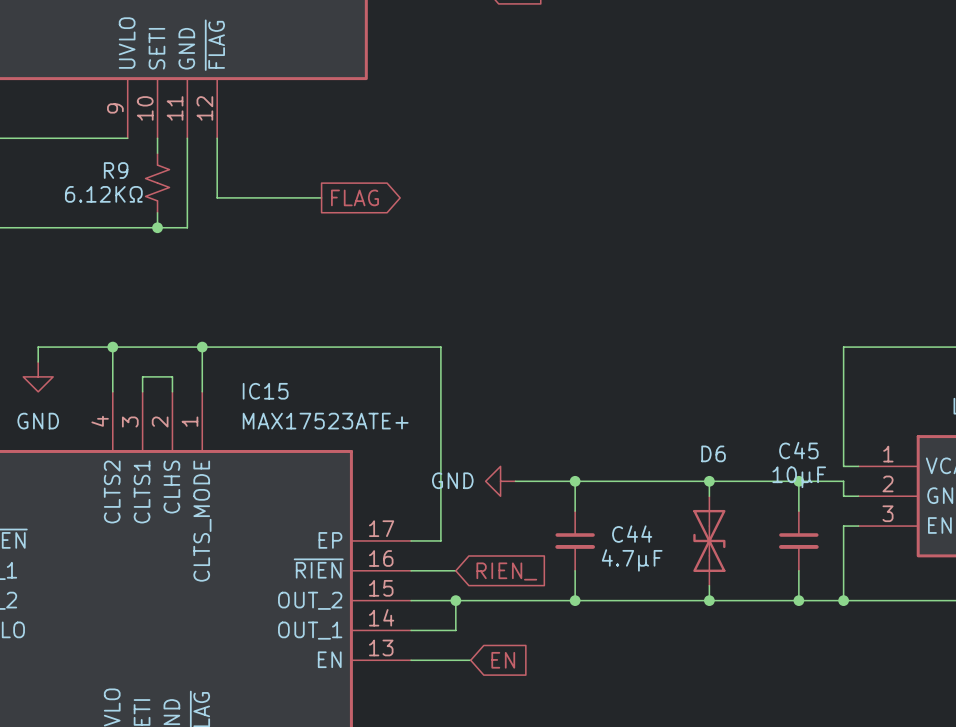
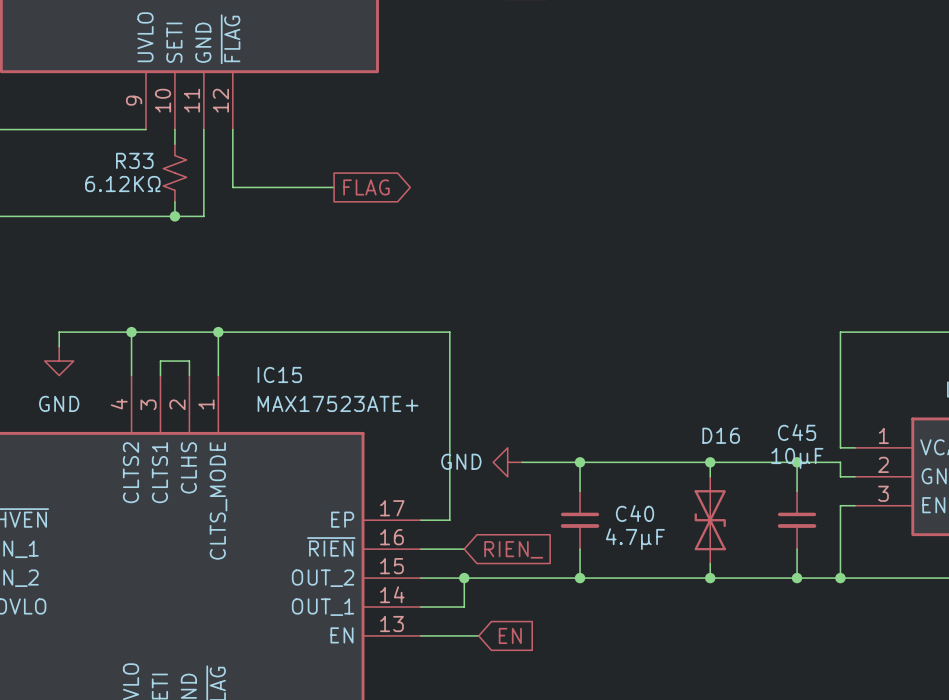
R9 name: R9 (116, 170) -> R33 (134, 160)
D6 name: D6 (713, 453) -> D16 (721, 435)
C44 name: C44 (632, 534) -> C40 (635, 513)

